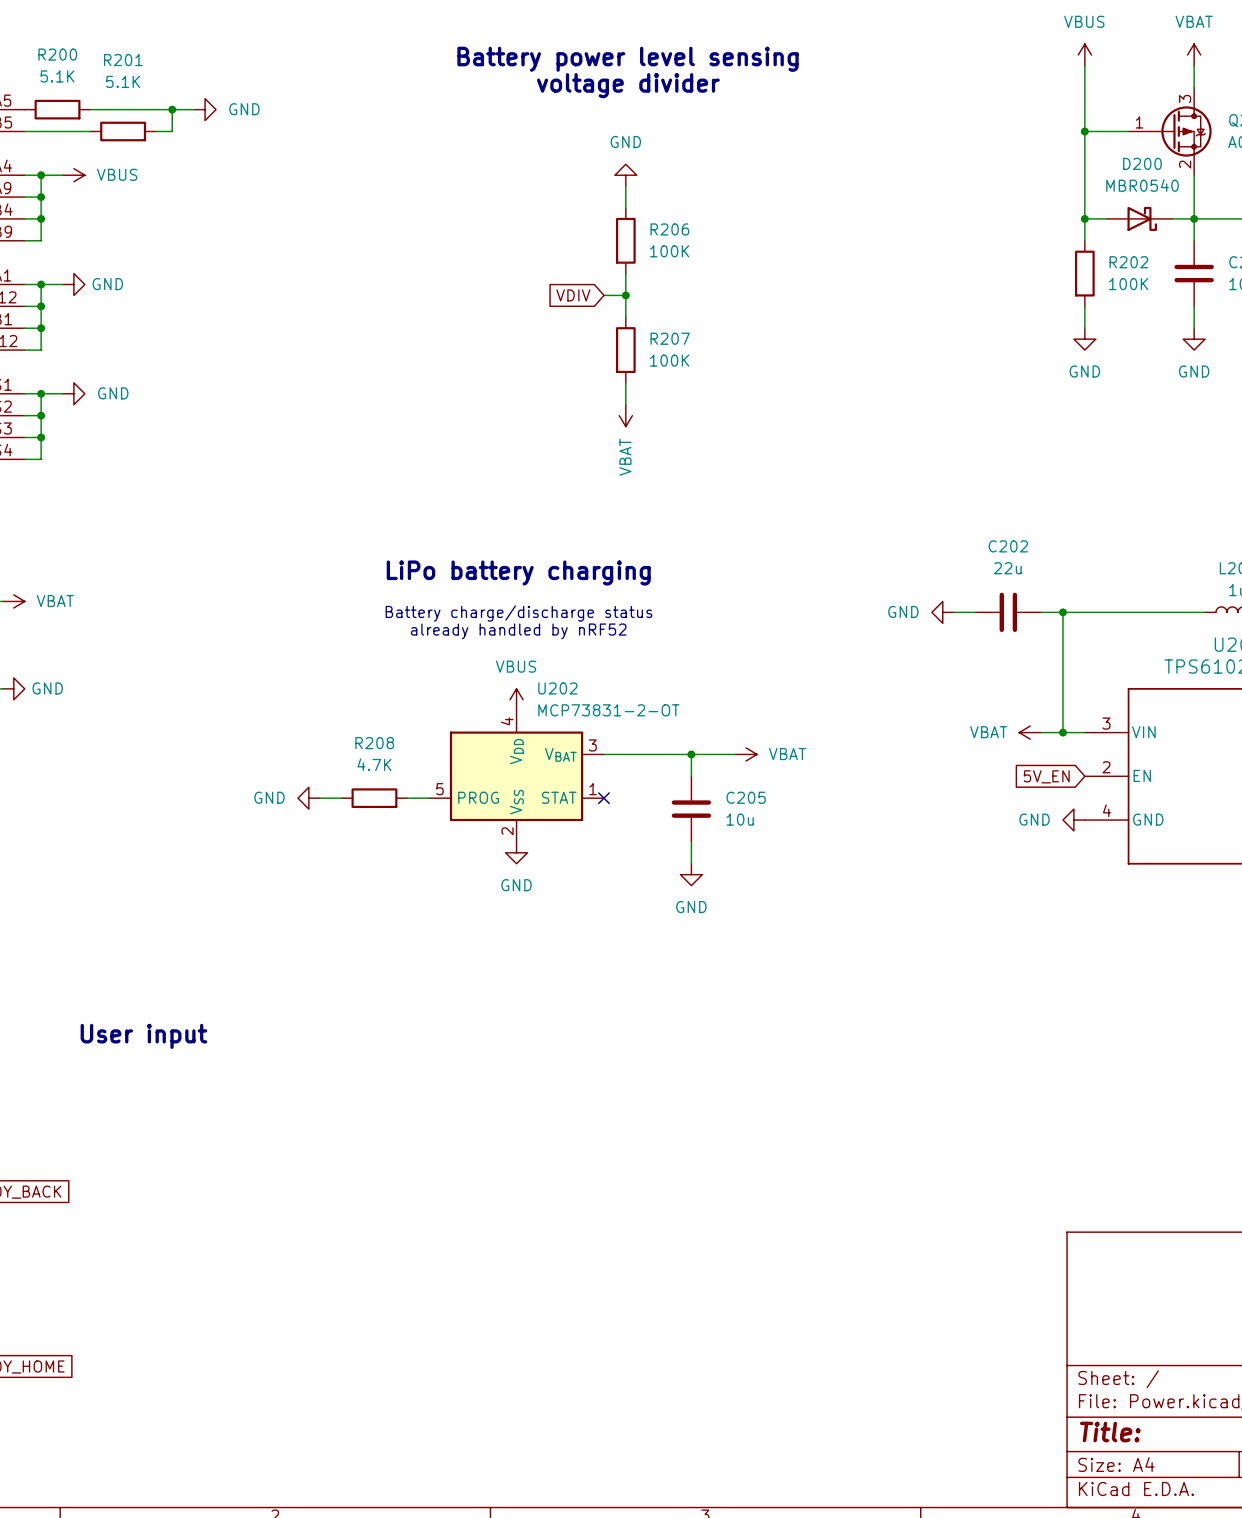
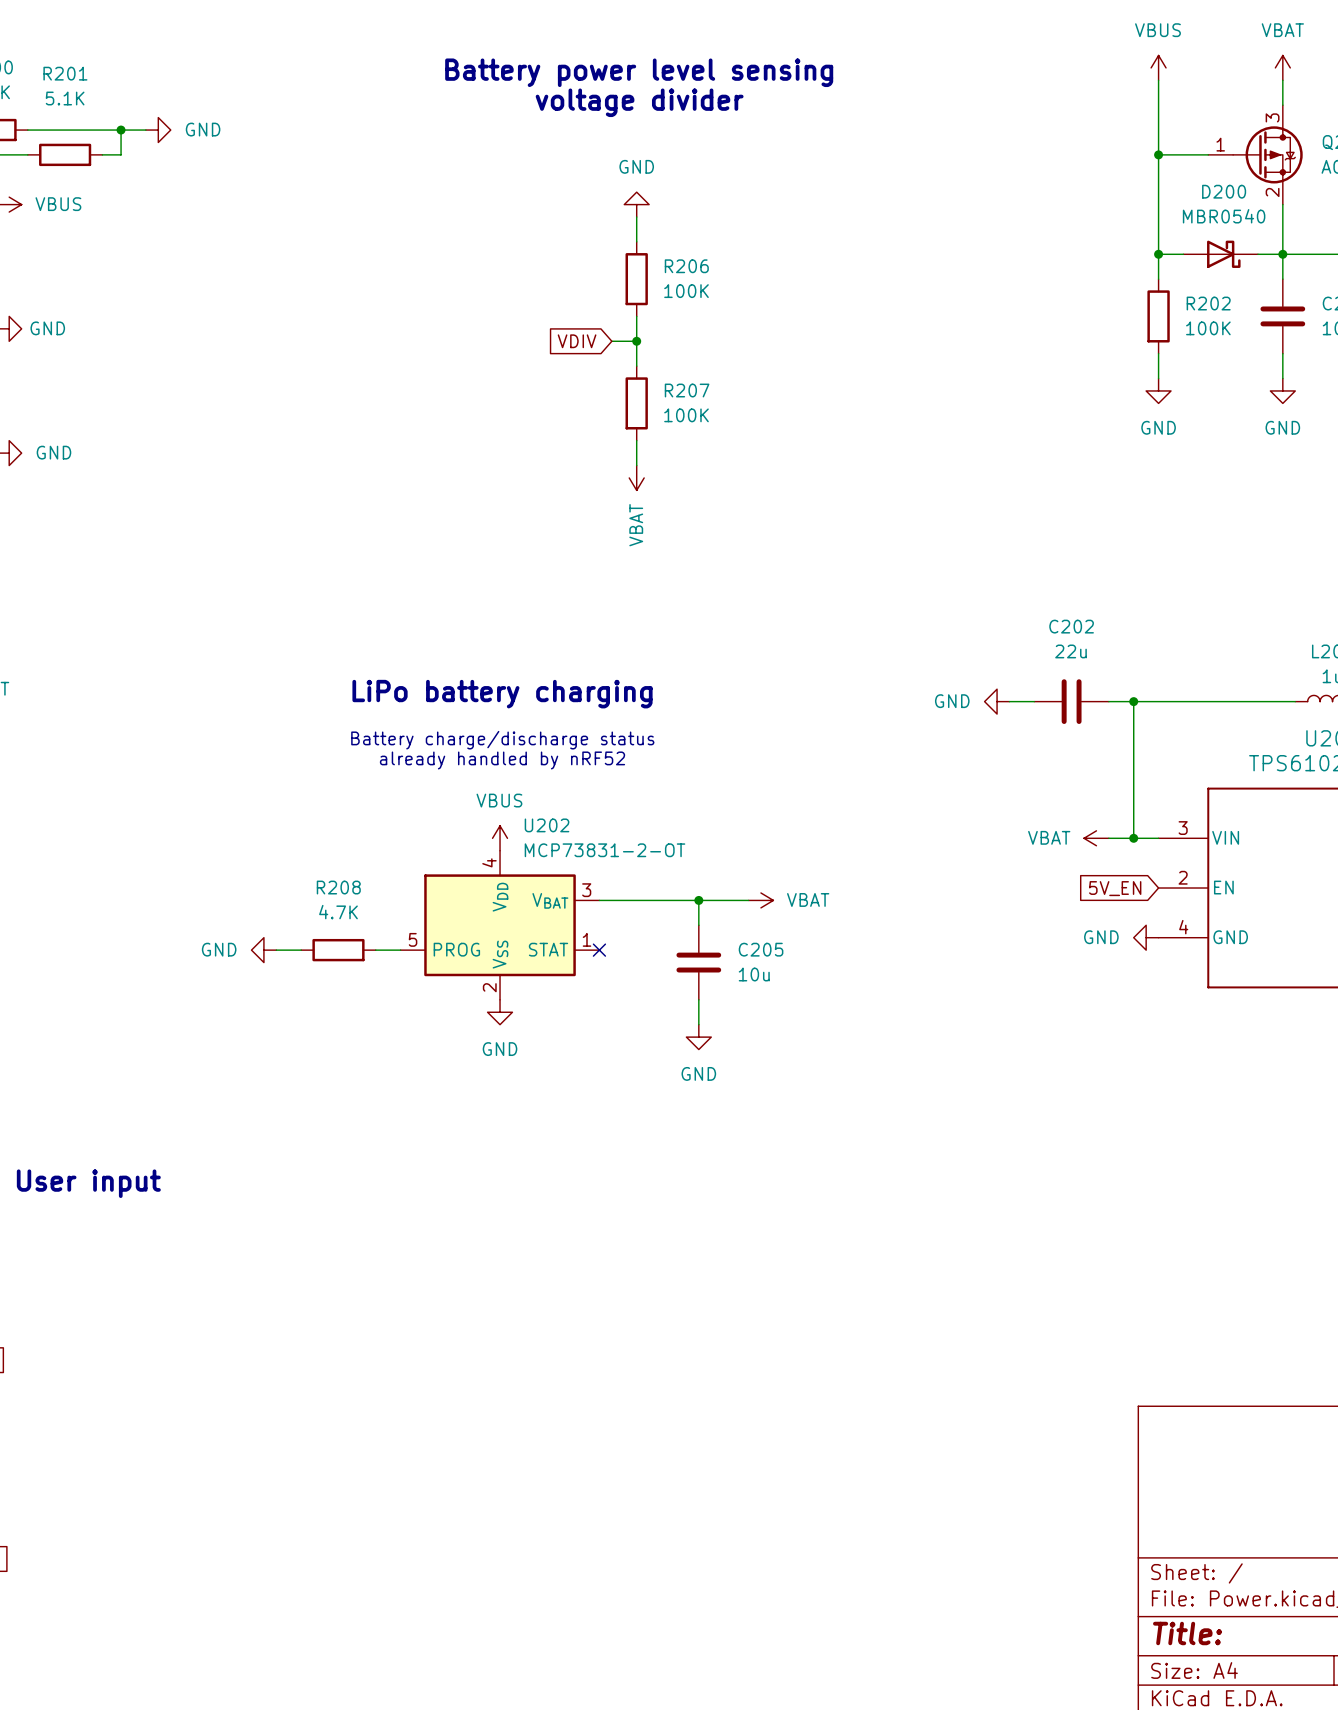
text position: LiPo battery charging (518, 573) -> LiPo battery charging (502, 694)
text position: Battery charge/discharge status (518, 613) -> Battery charge/discharge status (502, 740)
text position: already handled by nRF52 (518, 631) -> already handled by nRF52 (502, 760)
power symbol position: VBUS (516, 699) -> VBUS (500, 838)
wire: (603, 754) (735, 754) -> (599, 900) (748, 900)
wire: (691, 754) (691, 776) -> (698, 900) (698, 925)
junction position: (691, 754) -> (698, 900)
power symbol position: VBAT (746, 754) -> VBAT (760, 900)
U202 position: (516, 776) -> (500, 925)
power symbol position: GND (308, 798) -> GND (263, 950)
wire: (319, 798) (341, 798) -> (276, 950) (301, 950)
R208 position: (374, 798) -> (338, 950)
wire: (407, 798) (429, 798) -> (375, 950) (400, 950)
no-connect mark position: (603, 798) -> (599, 950)
C205 position: (691, 809) -> (698, 962)
wire: (691, 841) (691, 863) -> (698, 999) (698, 1024)
power symbol position: GND (516, 852) -> GND (500, 1012)
power symbol position: GND (691, 874) -> GND (698, 1037)

